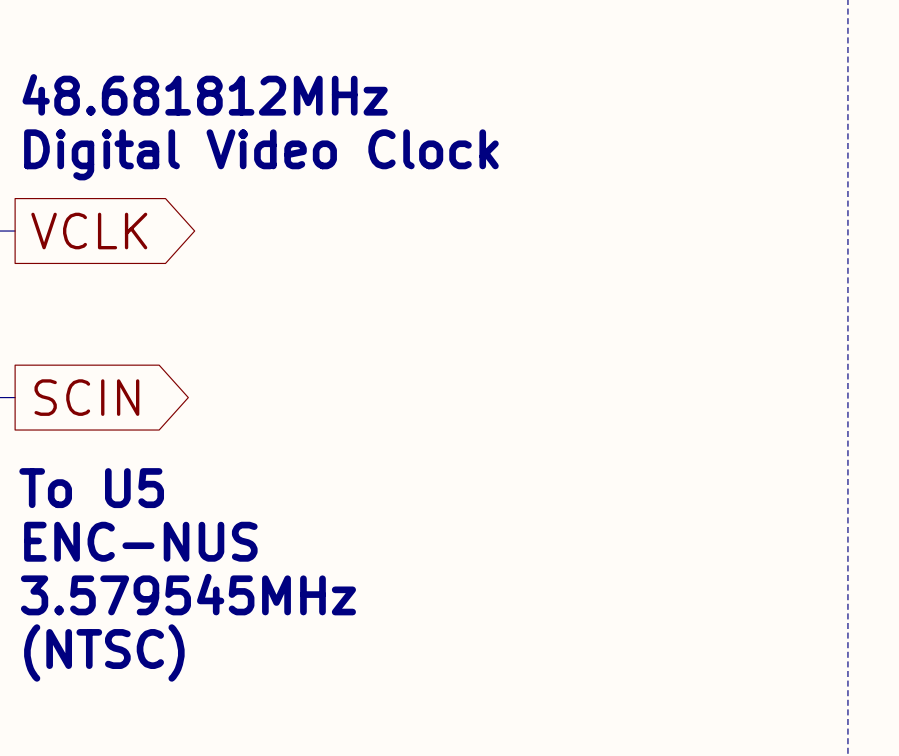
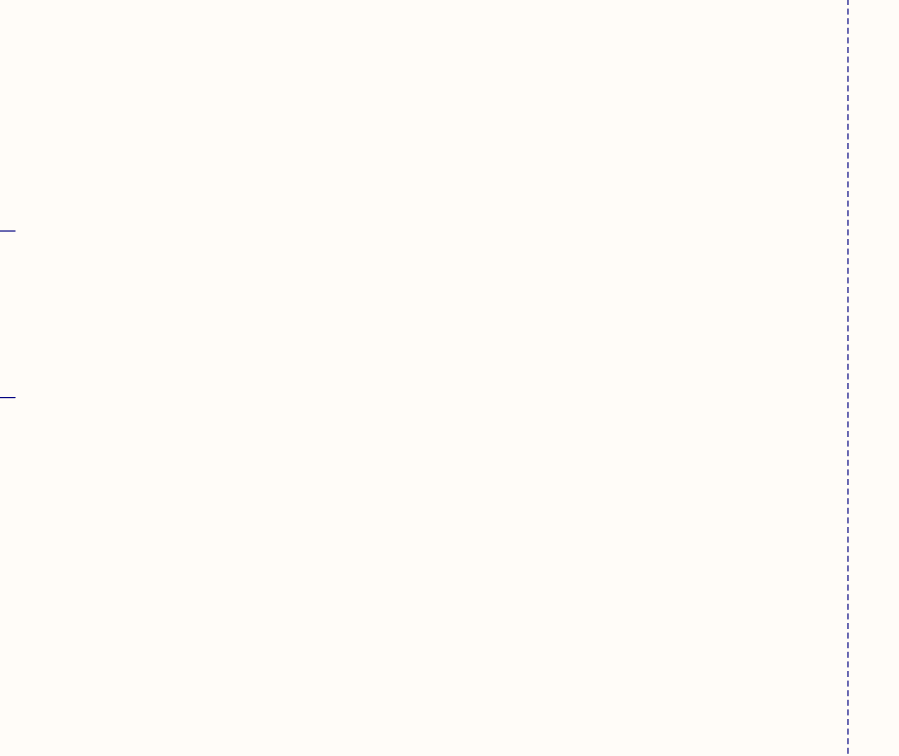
text: 48.681812MHz (205, 94) -> none
text: Digital Video Clock (261, 154) -> none
global label: VCLK (89, 231) -> none
global label: SCIN (86, 397) -> none
text: To U5 (91, 488) -> none
text: ENC-NUS (140, 541) -> none
text: 3.579545MHz (188, 594) -> none
text: (NTSC) (104, 652) -> none

